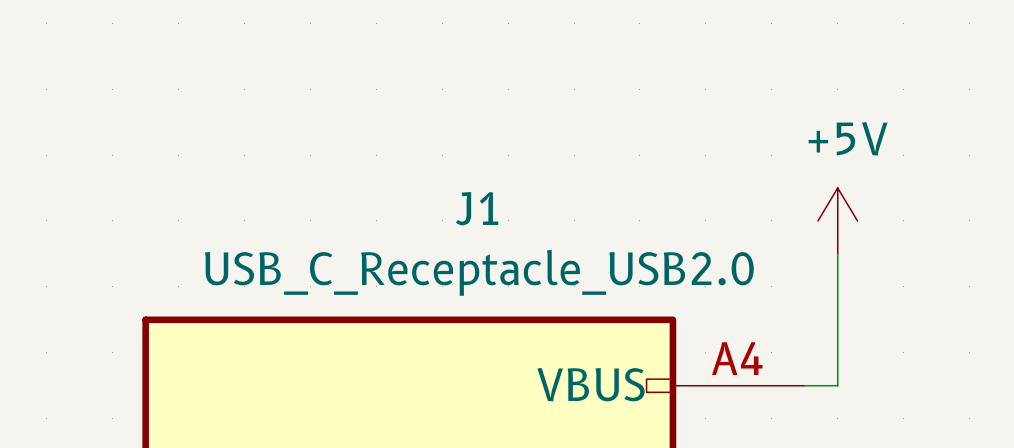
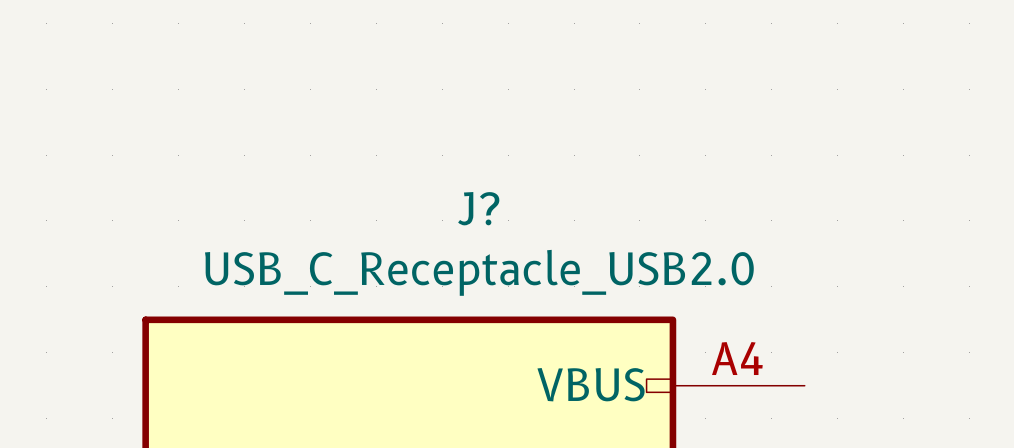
J1 name: J1 (477, 208) -> J? (478, 208)
power symbol: +5V (837, 220) -> none
wire: (837, 253) (837, 385) (804, 385) -> none

